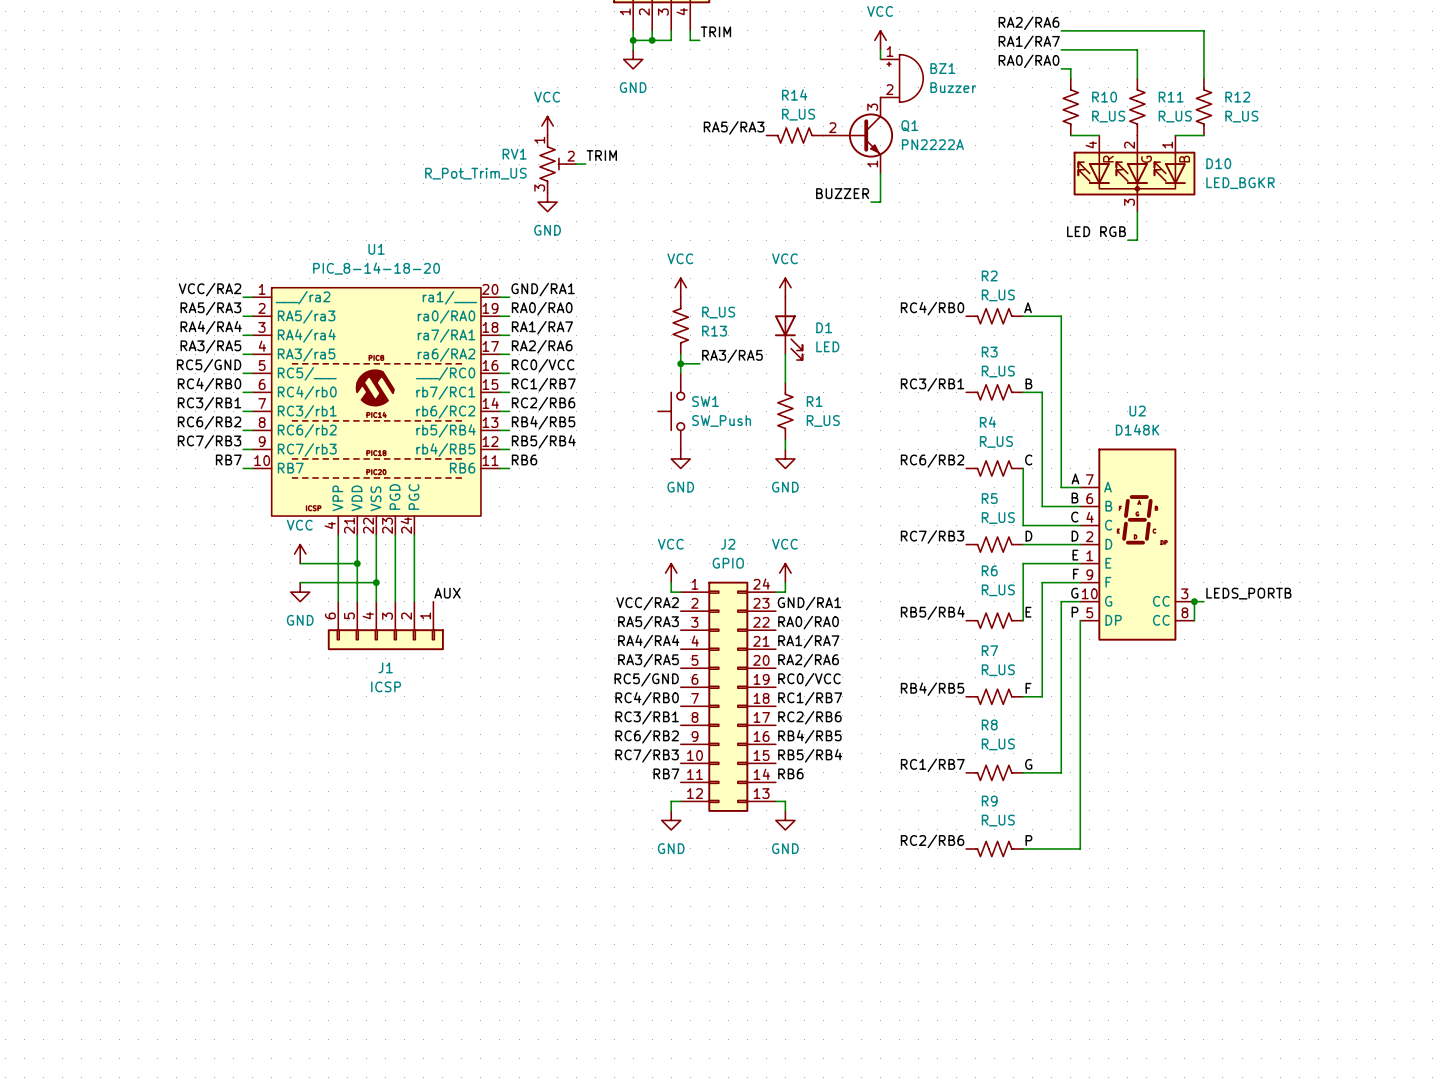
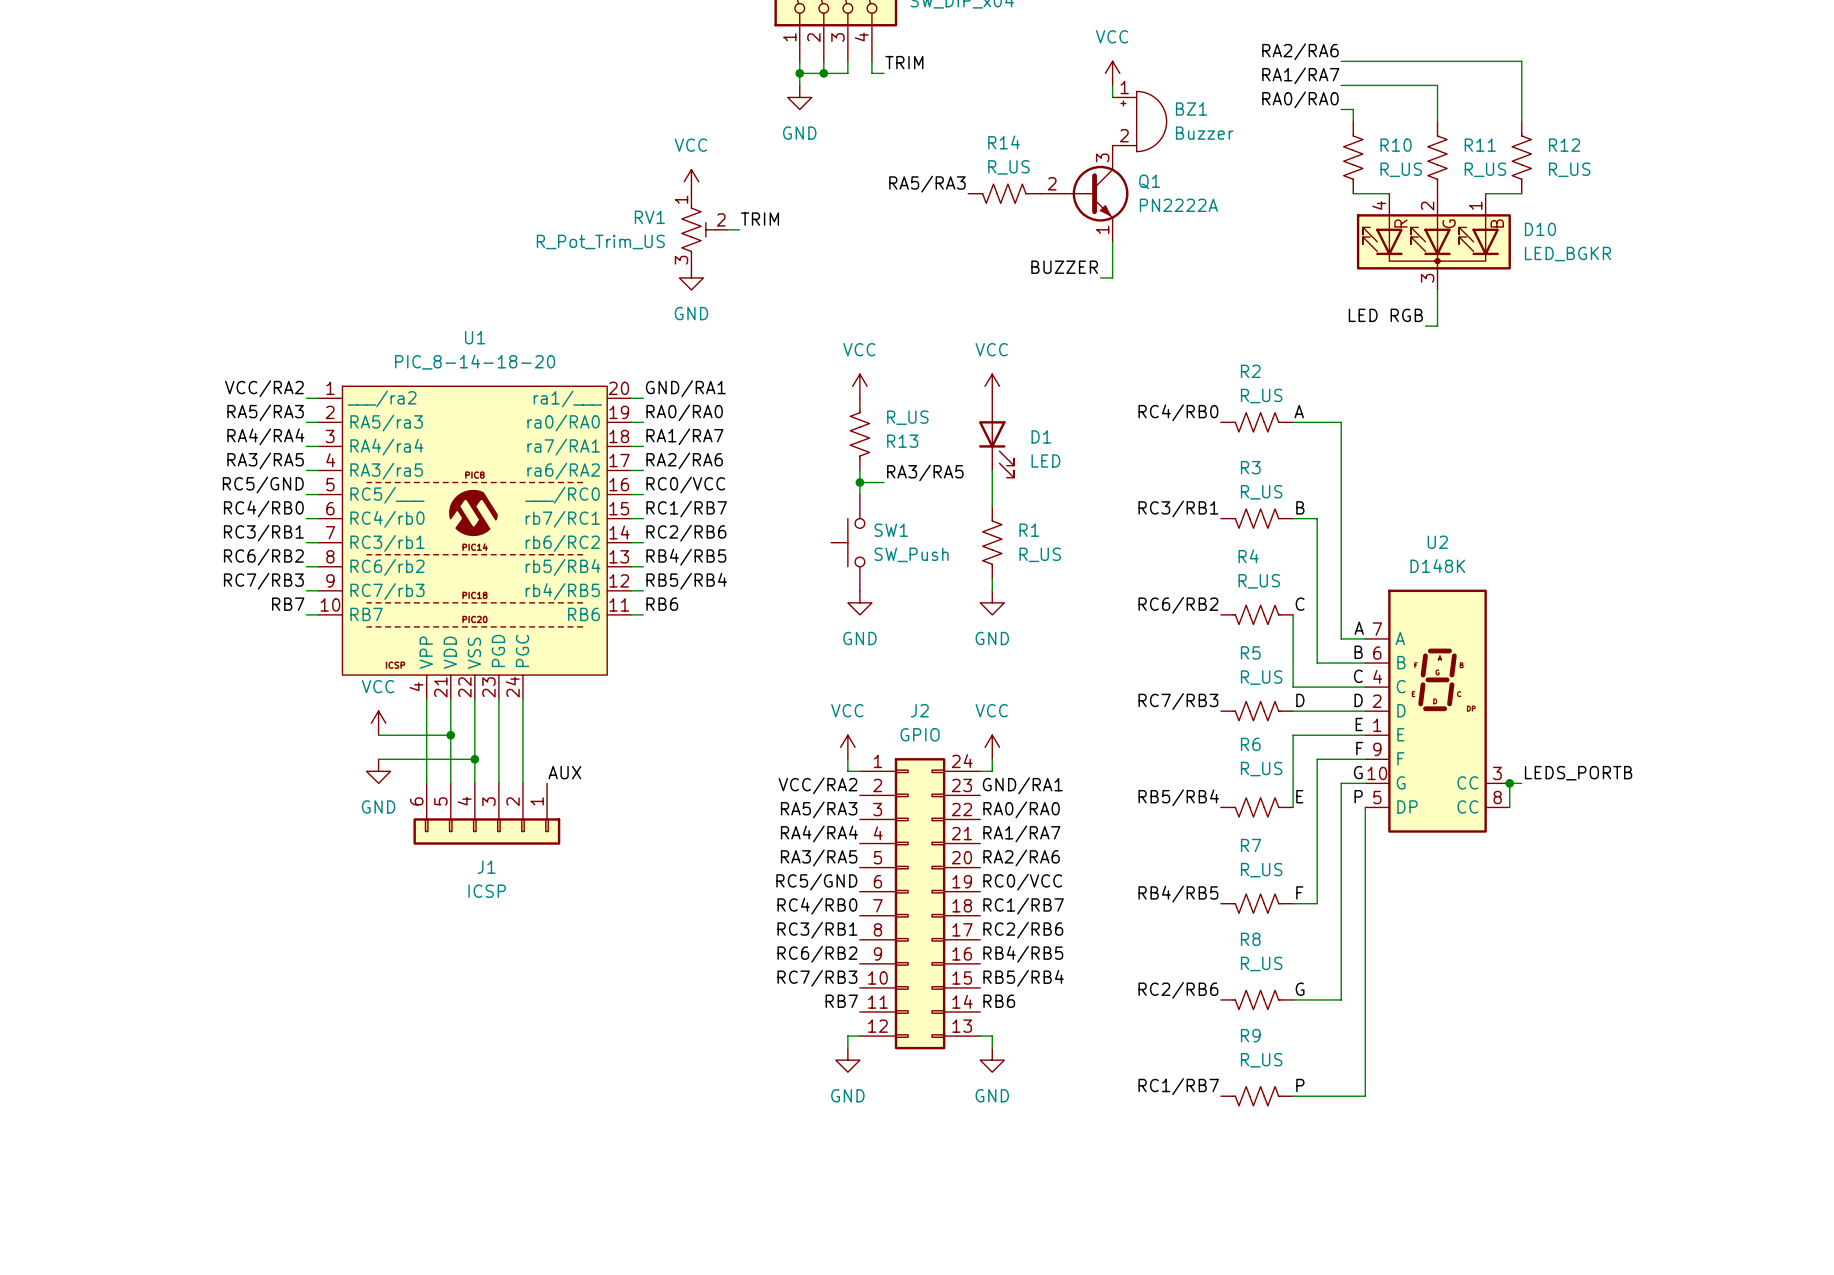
label: RC1/RB7 (932, 765) -> RC2/RB6 (1178, 990)
label: RC2/RB6 (932, 841) -> RC1/RB7 (1178, 1086)

